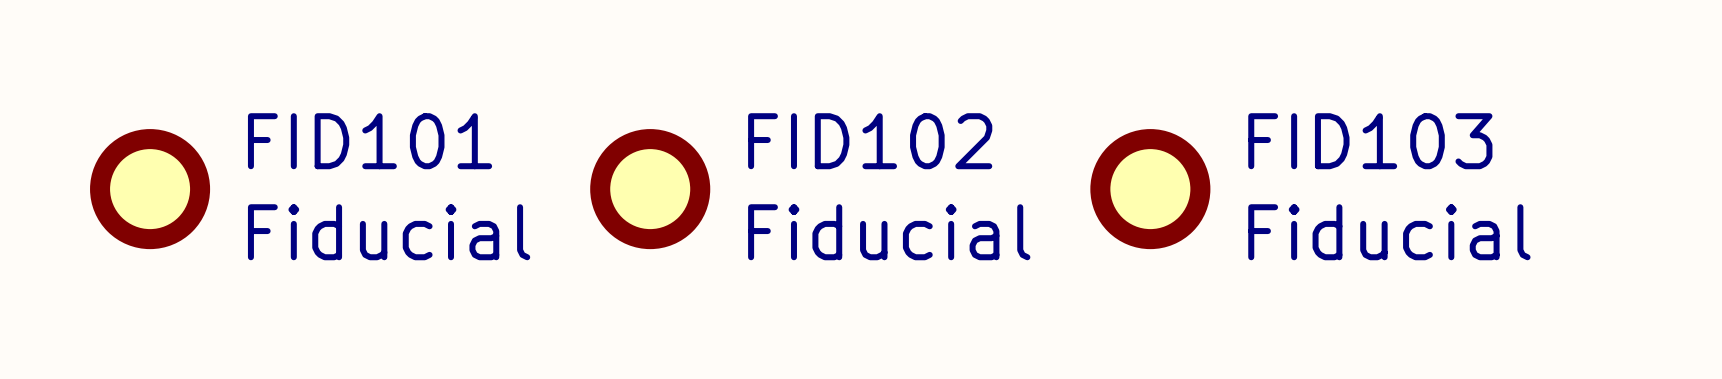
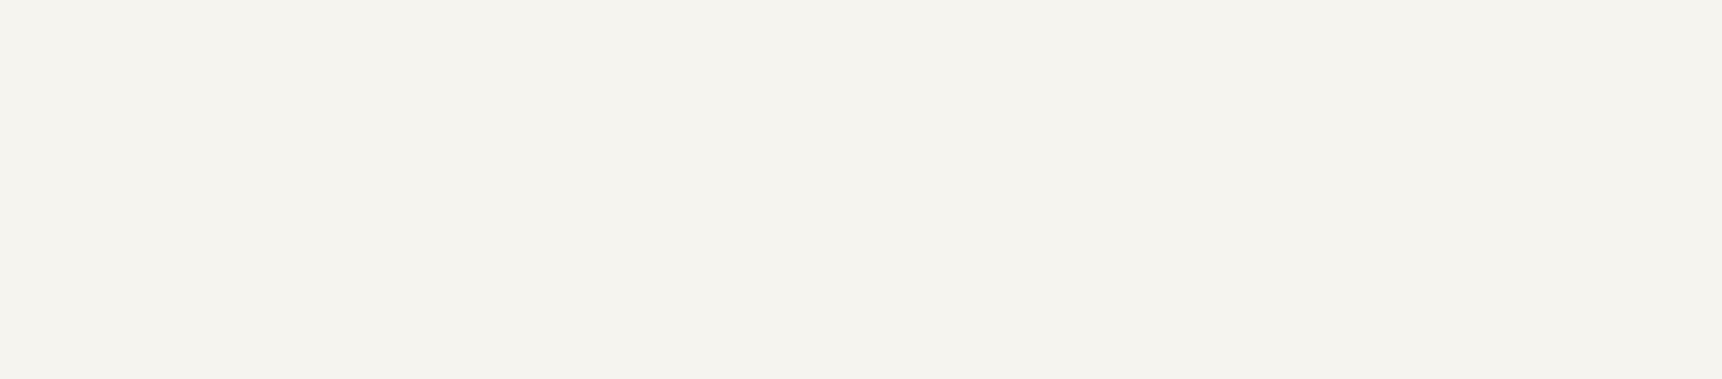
FID101: Fiducial (150, 189) -> none
FID102: Fiducial (650, 189) -> none
FID103: Fiducial (1150, 189) -> none

